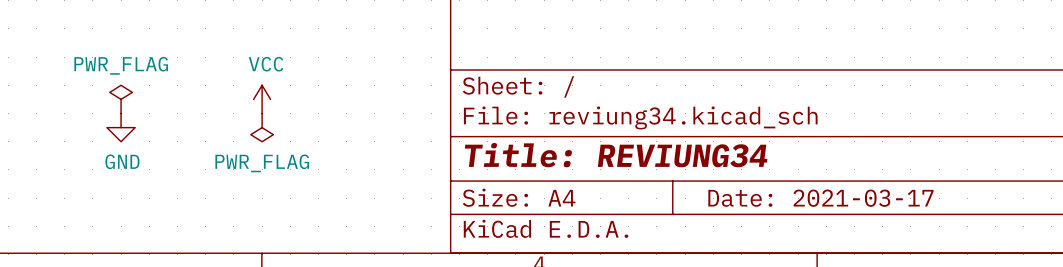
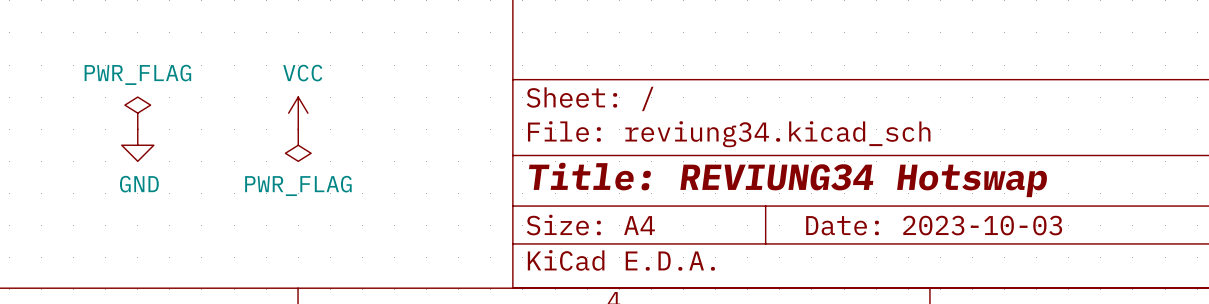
title block: Title: REVIUNG34 (616, 155) -> Title: REVIUNG34 Hotswap (788, 179)
title block: Date: 2021-03-17 (820, 198) -> Date: 2023-10-03 (934, 225)

